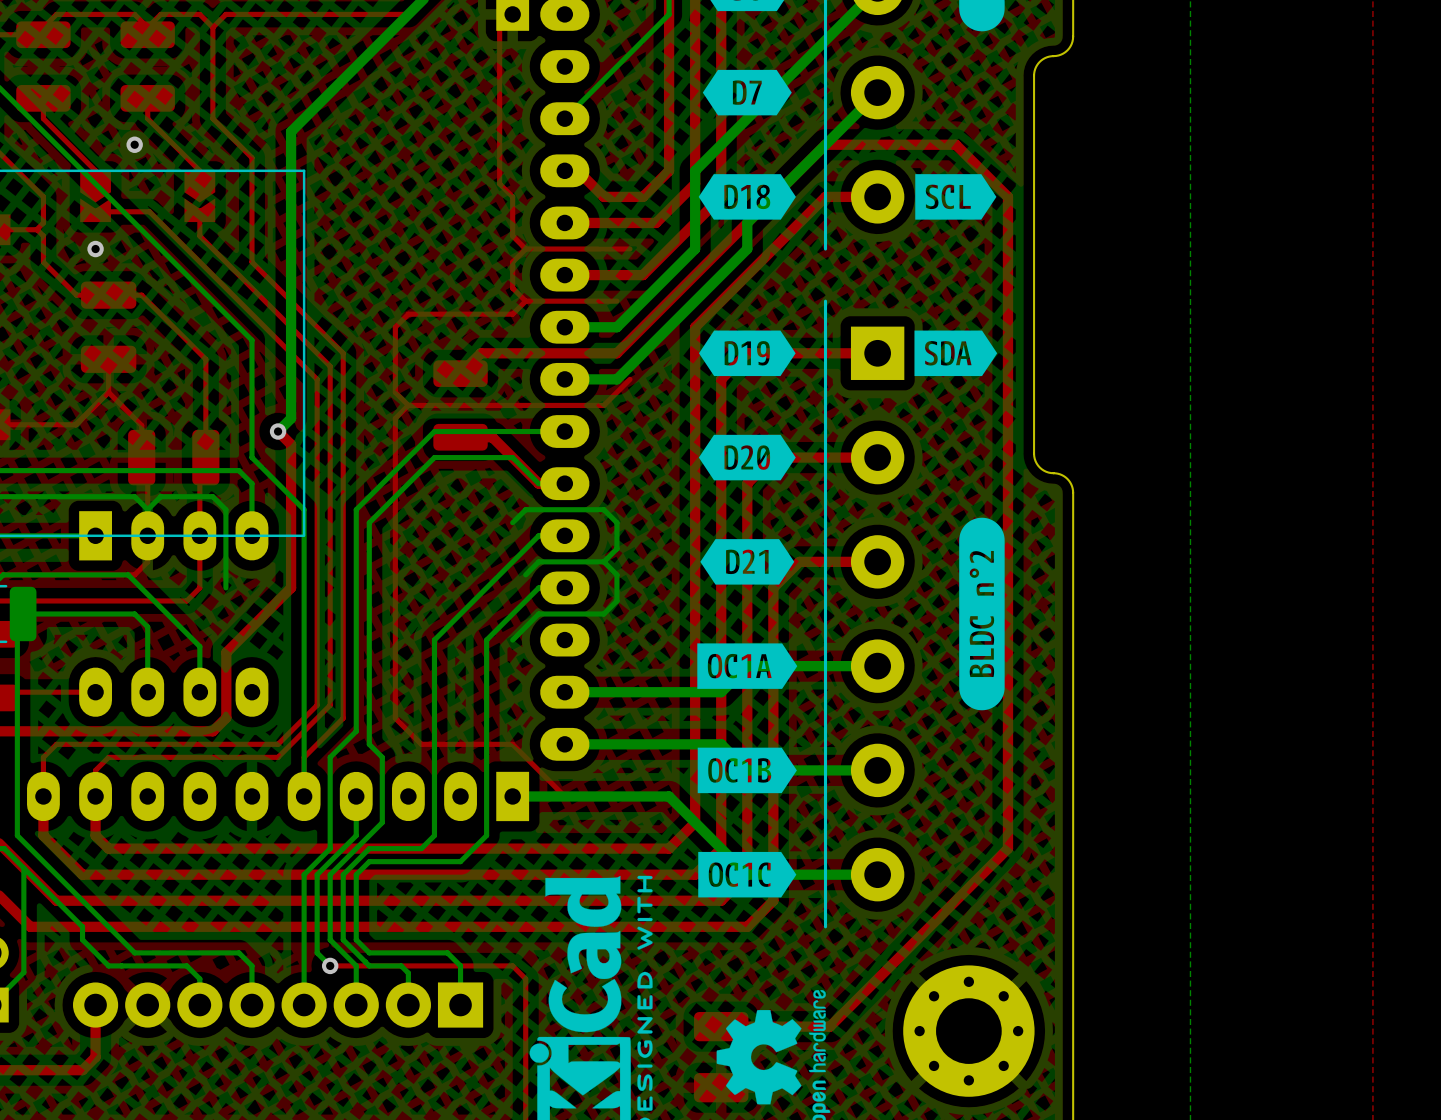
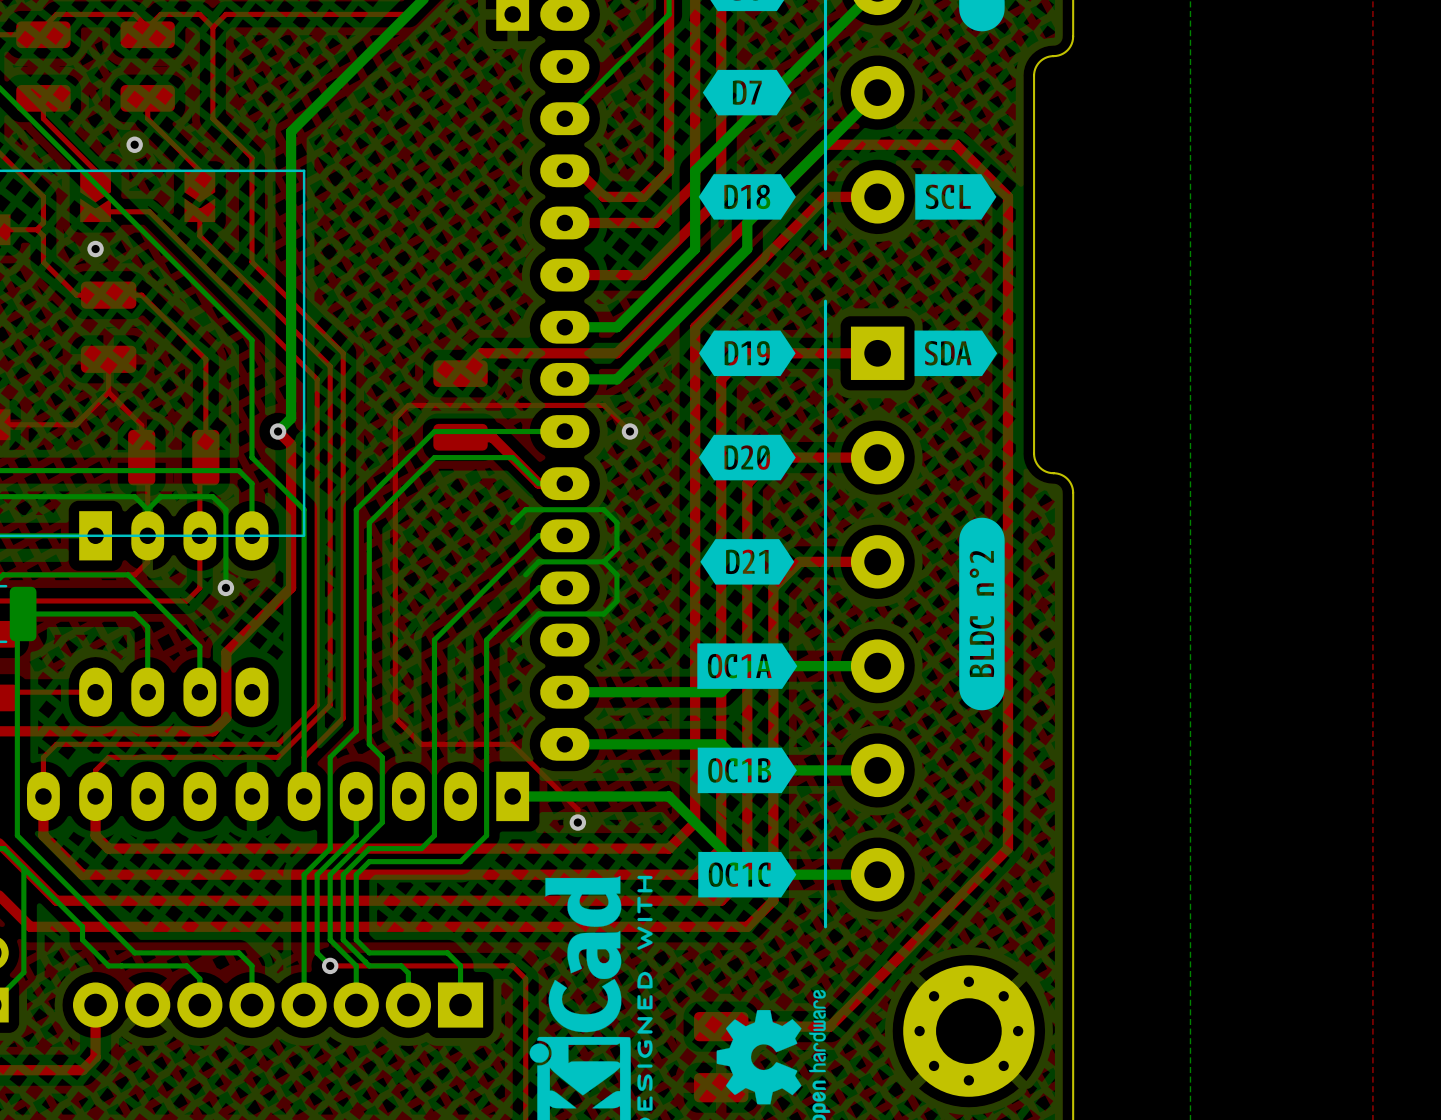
top track: (512, 14) (499, 27) (499, 183) (512, 196) (512, 235) (525, 249) -> none
top track: (525, 249) (512, 262) (512, 288) (525, 301) -> none
top track: (629, 249) (525, 249) -> none
top track: (525, 301) (512, 314) (408, 314) (395, 327) (395, 392) (408, 405) -> none
top track: (616, 301) (525, 301) -> none
top track: (629, 379) (603, 405) -> (629, 431) (603, 405)
via: none -> (629, 431)
via: none -> (225, 587)
top track: none -> (564, 796) (577, 809) (577, 822)
via: none -> (577, 822)

